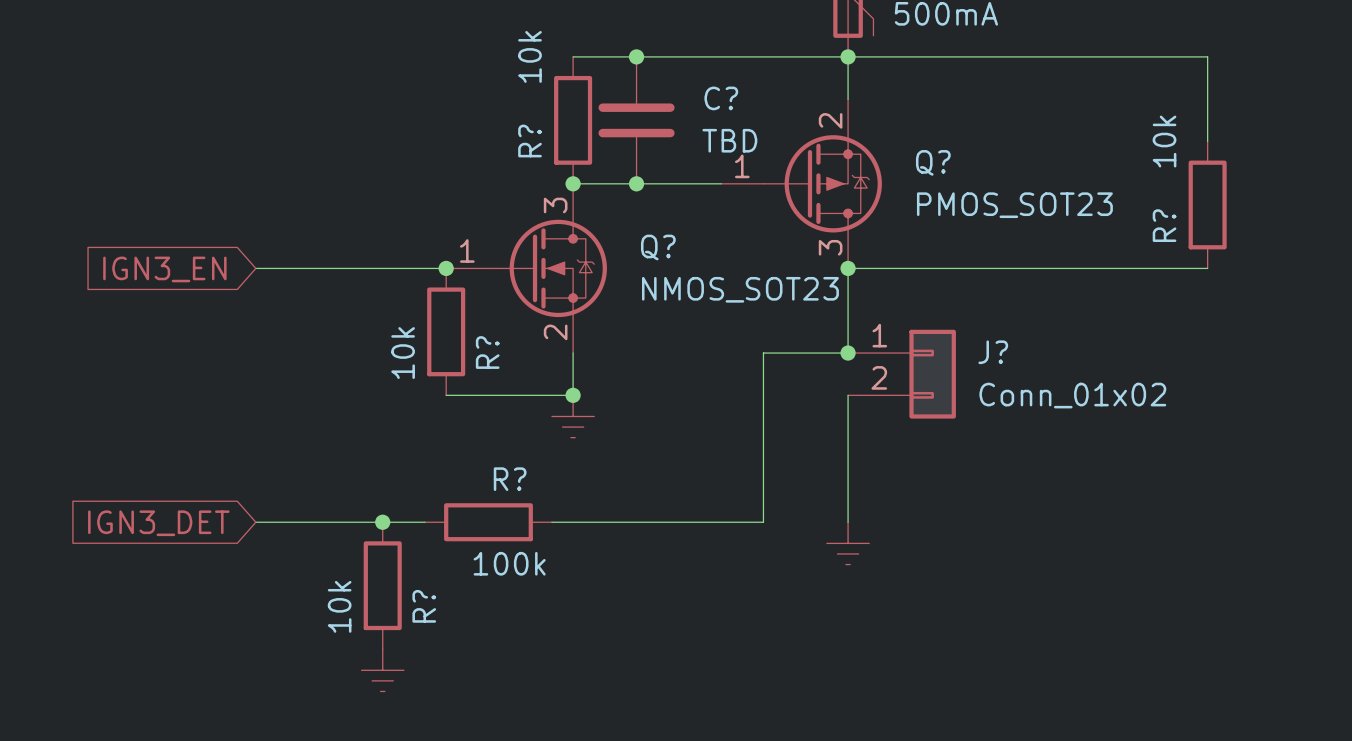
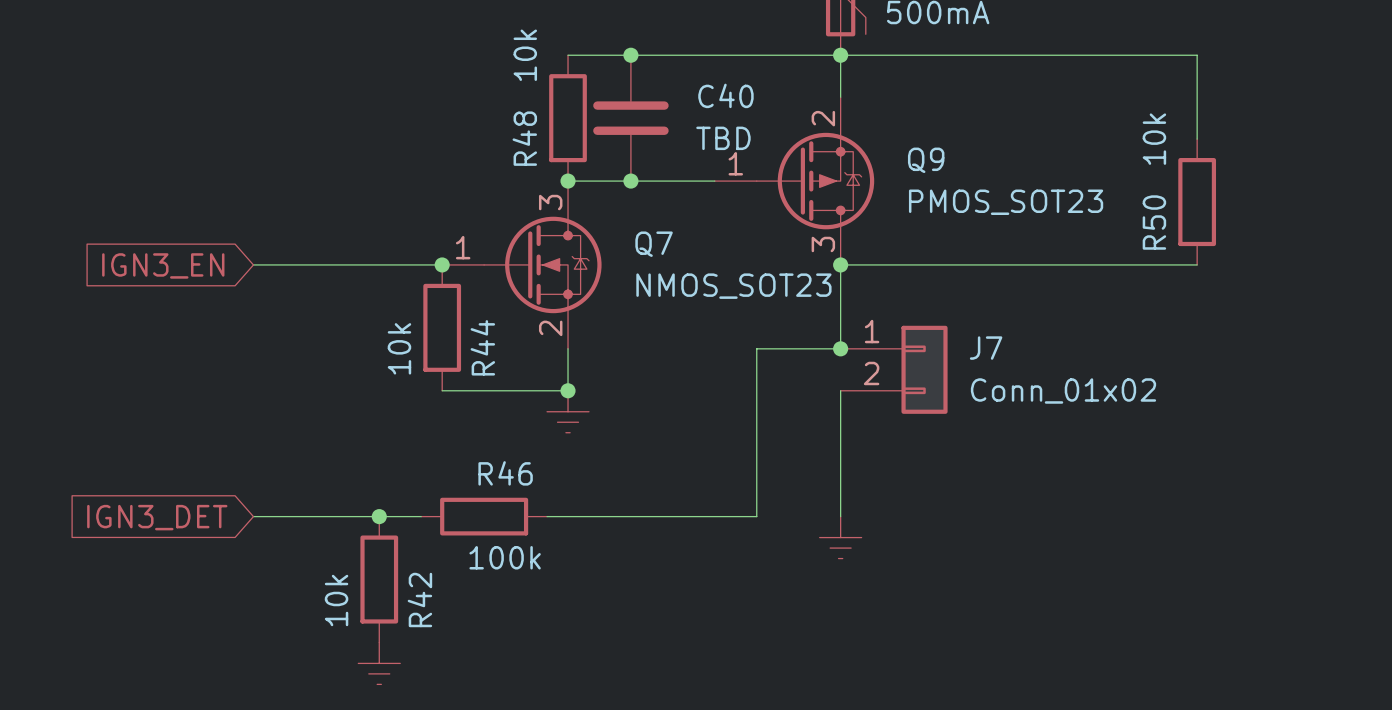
C? name: C? (721, 98) -> C40 (725, 95)
R? name: R? (530, 141) -> R48 (524, 138)
Q? name: Q? (933, 162) -> Q9 (926, 160)
R? name: R? (1164, 225) -> R50 (1154, 222)
Q? name: Q? (658, 247) -> Q7 (654, 244)
R? name: R? (487, 352) -> R44 (482, 347)
J? name: J? (993, 352) -> J7 (986, 348)
R? name: R? (510, 479) -> R46 (505, 473)
R? name: R? (424, 606) -> R42 (419, 599)

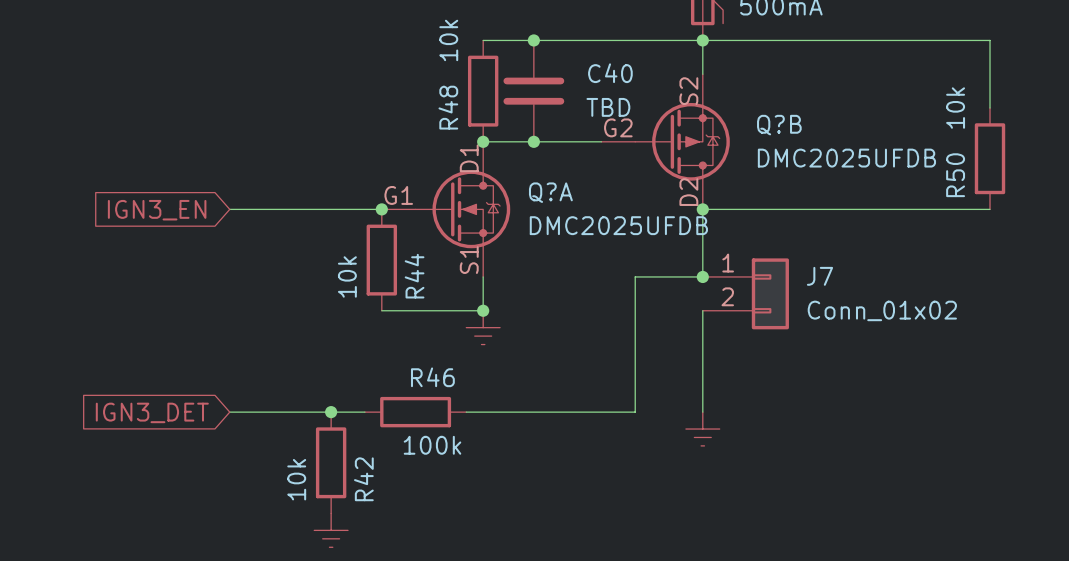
Q9 pin number: 2 (823, 118) -> S2 (688, 91)
Q9 name: Q9 (926, 160) -> Q?B (779, 125)
Q9 pin number: 1 (735, 163) -> G2 (618, 127)
Q7 pin number: 3 (550, 202) -> D1 (469, 158)
Q9 value: PMOS_SOT23 (1006, 202) -> DMC2025UFDB (846, 158)
Q7 name: Q7 (654, 244) -> Q?A (550, 192)
Q9 pin number: 3 (823, 244) -> D2 (688, 192)
Q7 pin number: 1 (463, 247) -> G1 (398, 195)
Q7 value: NMOS_SOT23 (733, 286) -> DMC2025UFDB (618, 225)
Q7 pin number: 2 (550, 328) -> S1 (469, 260)

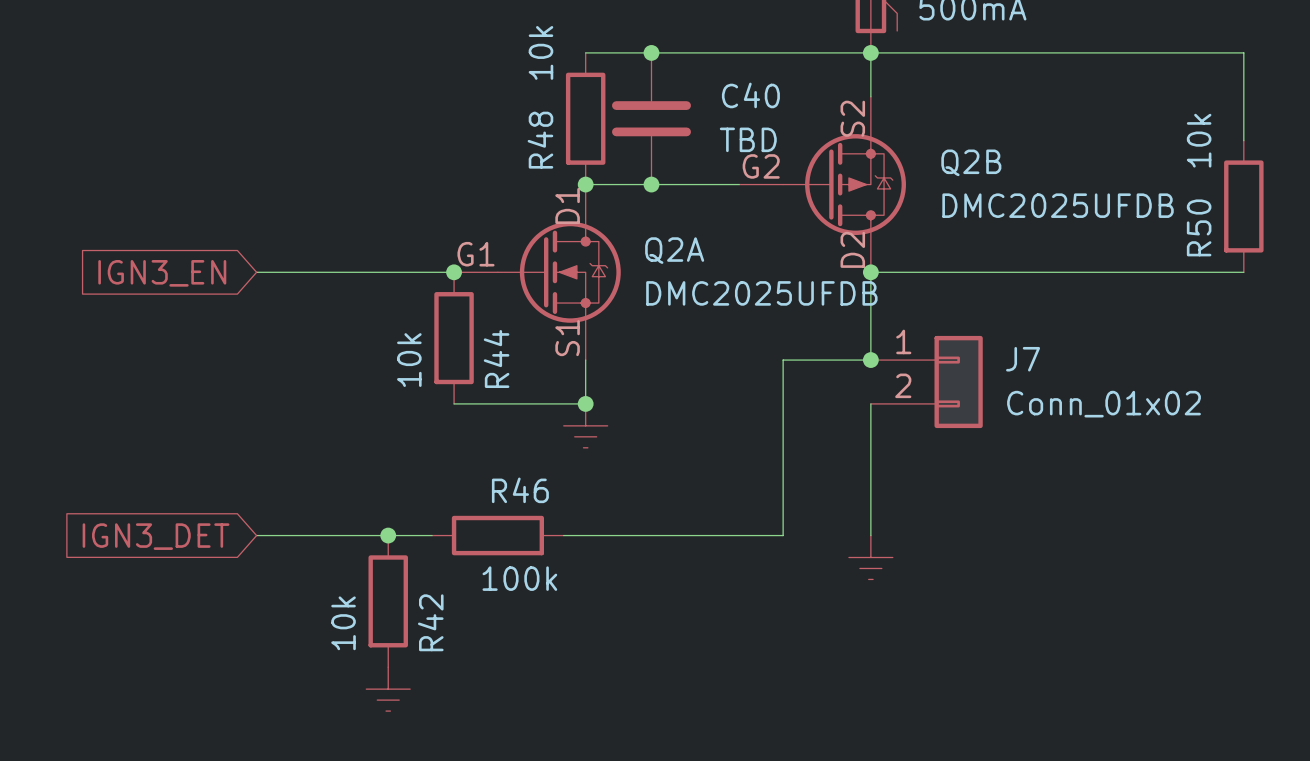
Q?B name: Q?B (779, 125) -> Q2B (971, 162)
Q?A name: Q?A (550, 192) -> Q2A (674, 250)

